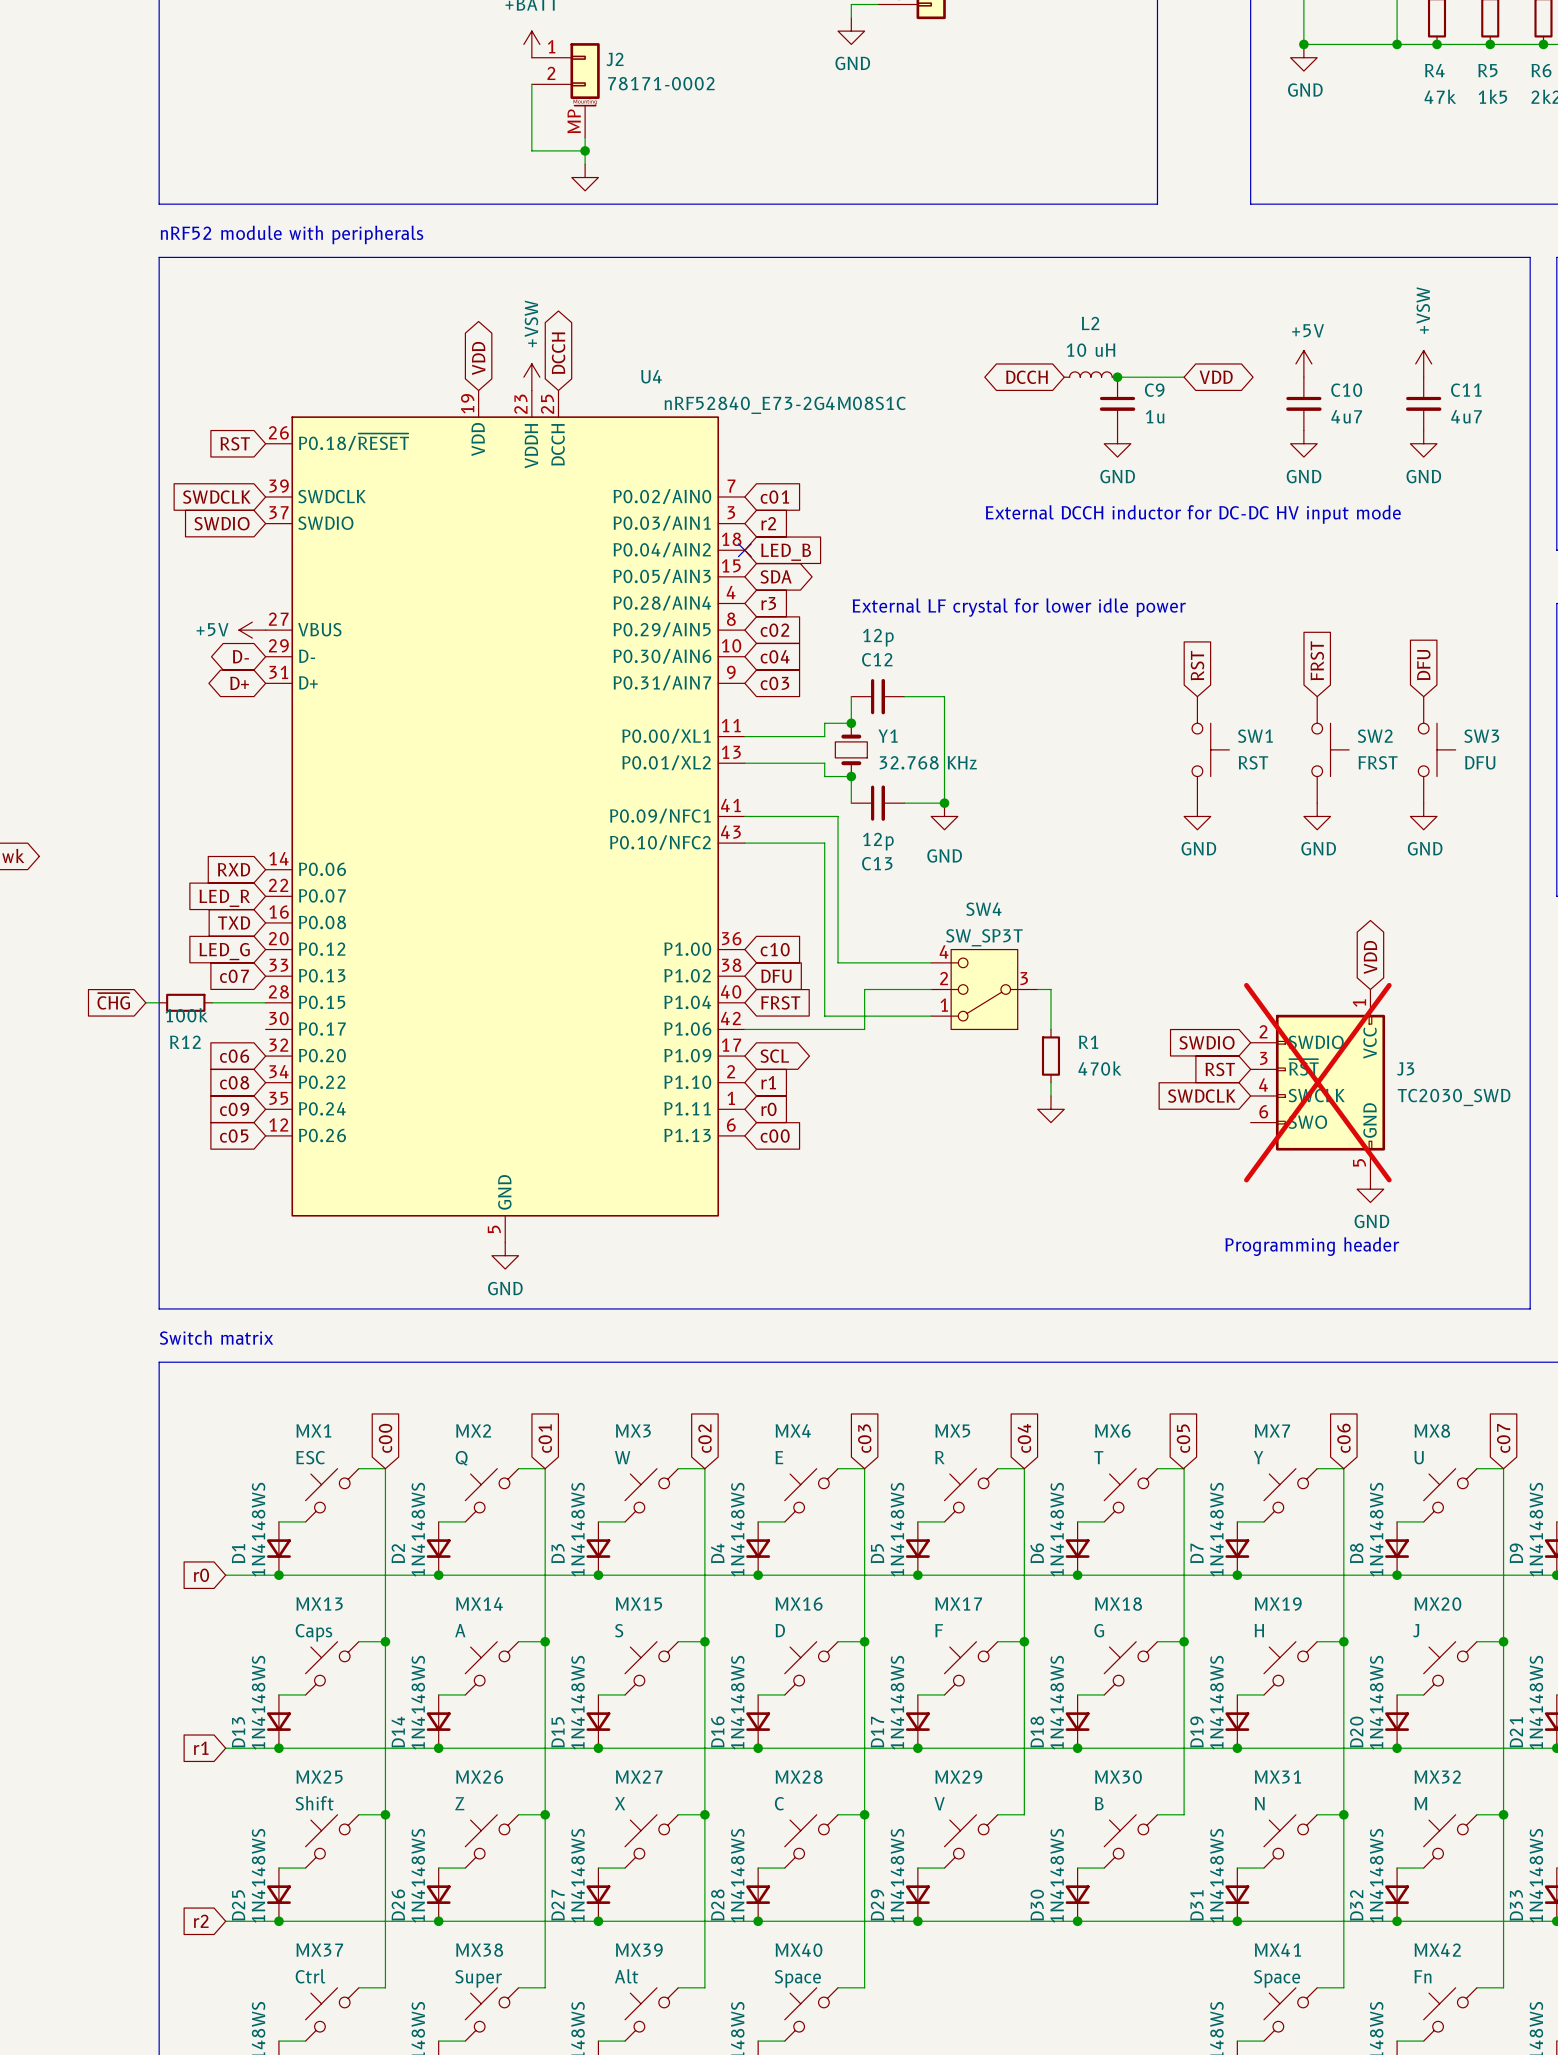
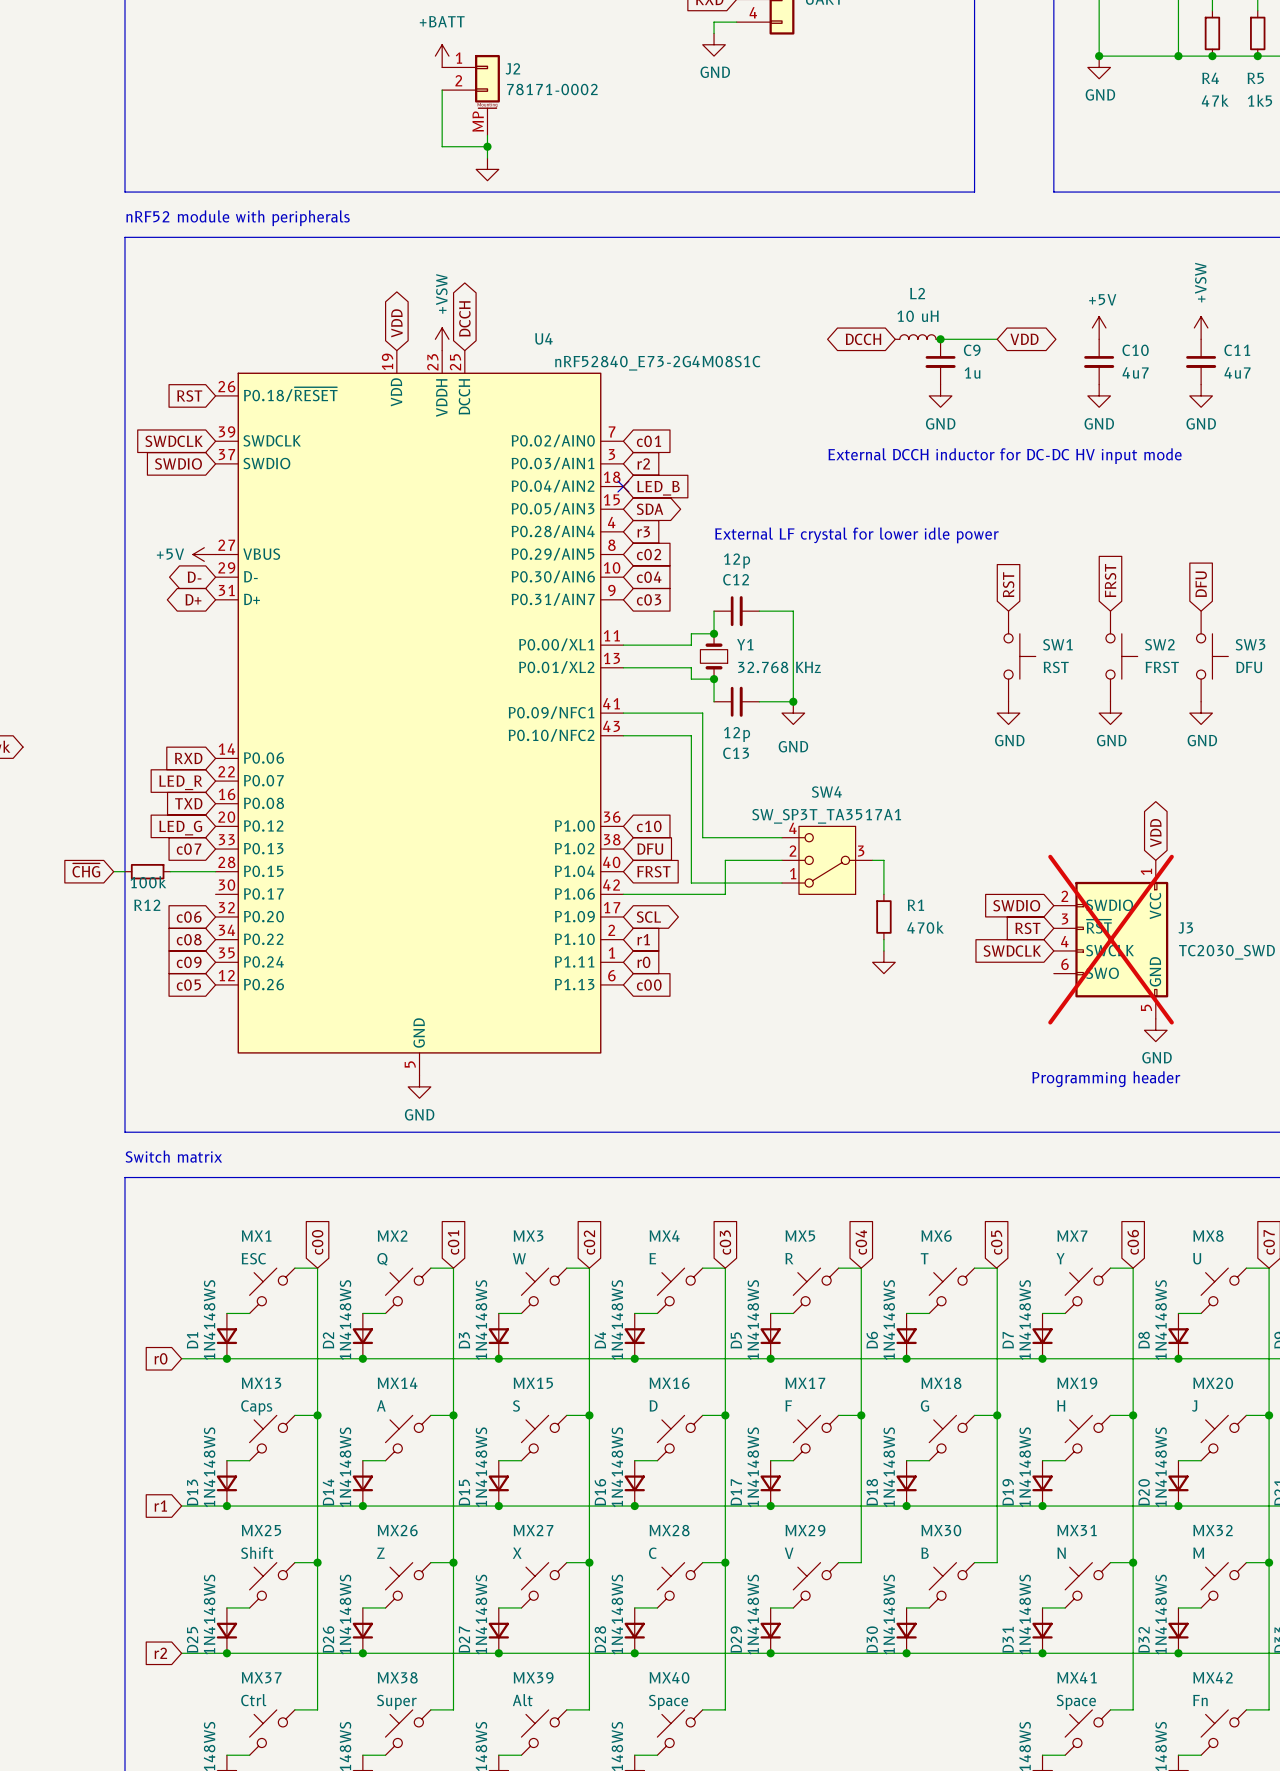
SW4 value: SW_SP3T (984, 937) -> SW_SP3T_TA3517A1 (826, 816)

